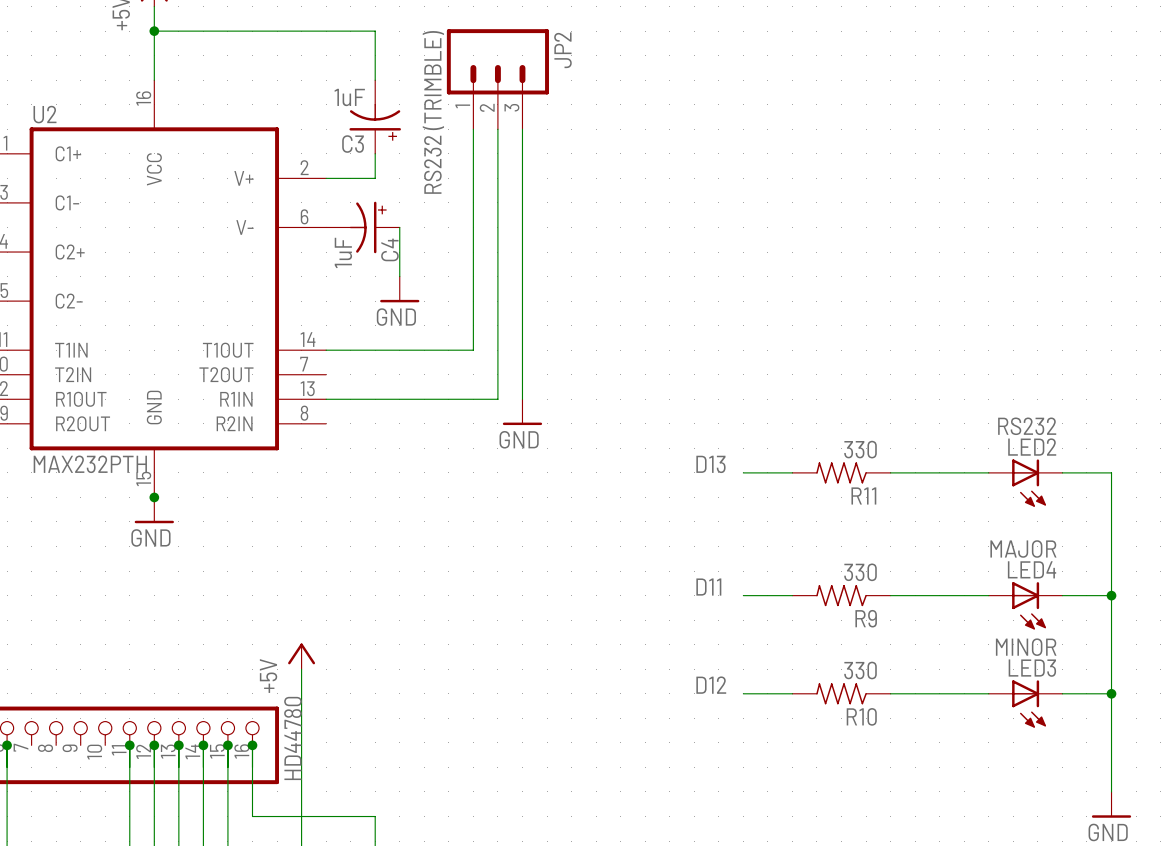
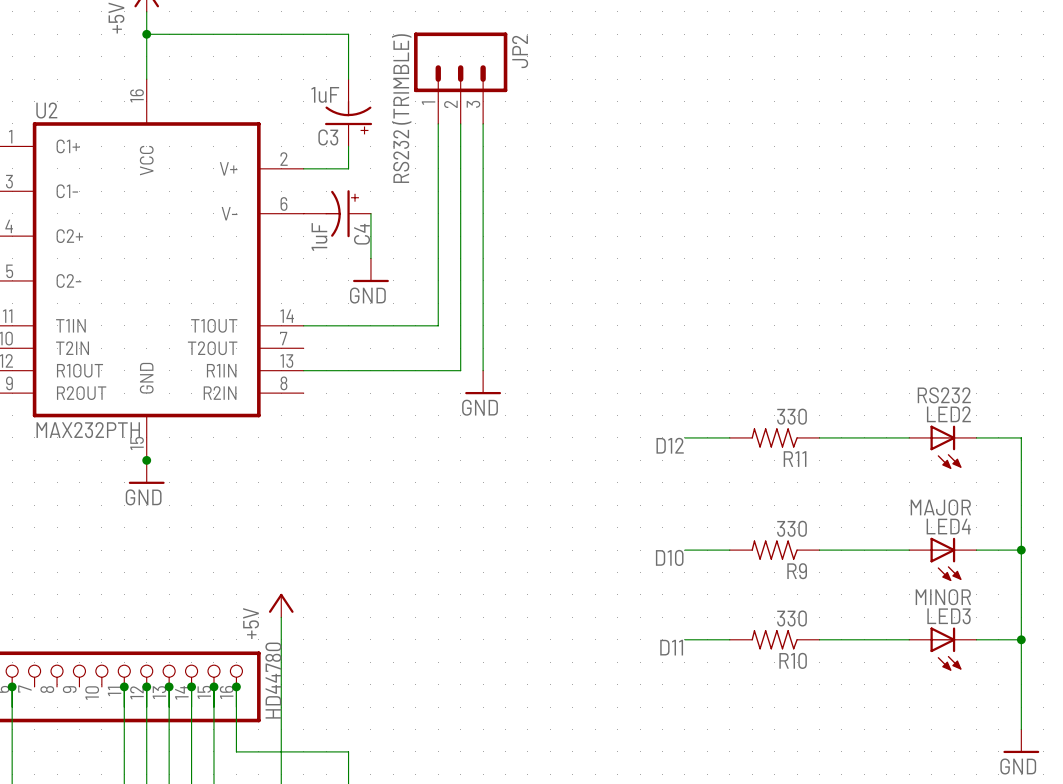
label: D13 (710, 464) -> none
label position: D11 (708, 587) -> D11 (671, 647)
label: none -> D10 (669, 557)
label position: D12 (711, 685) -> D12 (670, 445)

